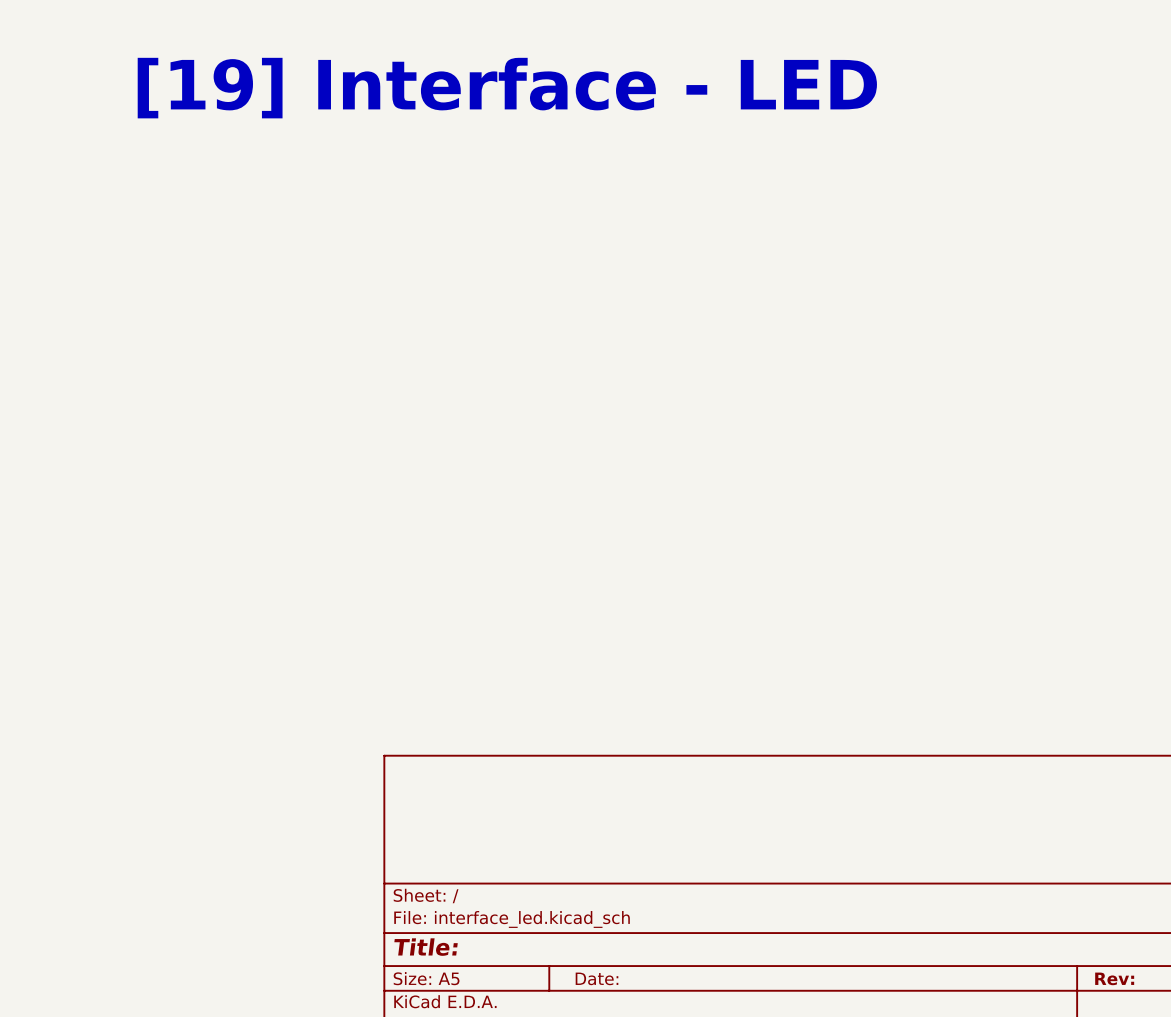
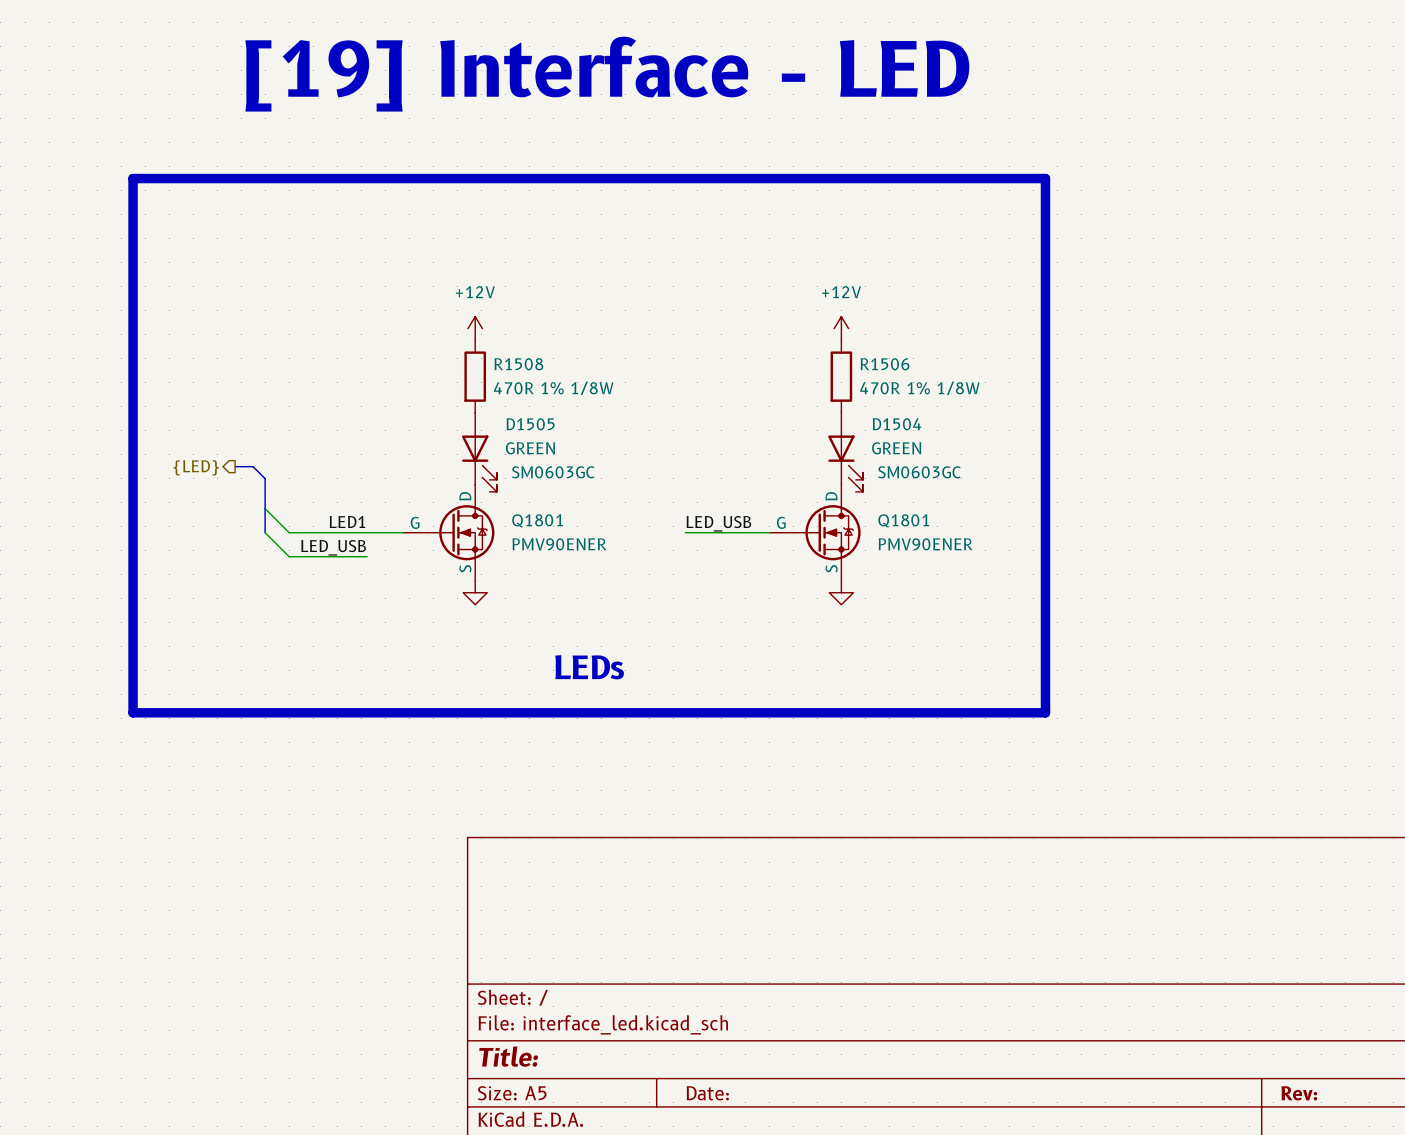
line: none -> (133, 178) (1045, 178) (1045, 712) (133, 712) (133, 178)
power symbol: none -> +12V (475, 328)
power symbol: none -> +12V (841, 328)
R1508: none -> 470R 1% 1/8W (475, 376)
R1506: none -> 470R 1% 1/8W (841, 376)
D1505: none -> GREEN (479, 452)
D1504: none -> GREEN (845, 452)
hierarchical label: none -> {LED} (196, 467)
bus: none -> (235, 466) (253, 466) (265, 478) (265, 532)
wire: none -> (265, 508) (289, 532) (403, 532)
label: none -> LED1 (347, 521)
label: none -> LED_USB (718, 523)
wire: none -> (265, 532) (289, 556) (367, 556)
Q1801: none -> PMV90ENER (448, 532)
wire: none -> (685, 532) (769, 532)
Q1801: none -> PMV90ENER (814, 532)
label: none -> LED_USB (333, 547)
power symbol: none -> (475, 592)
power symbol: none -> (841, 592)
text: none -> LEDs (589, 667)

